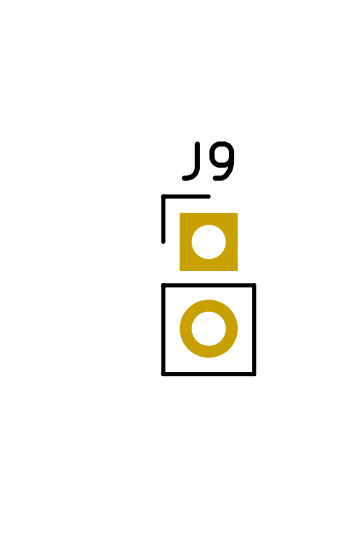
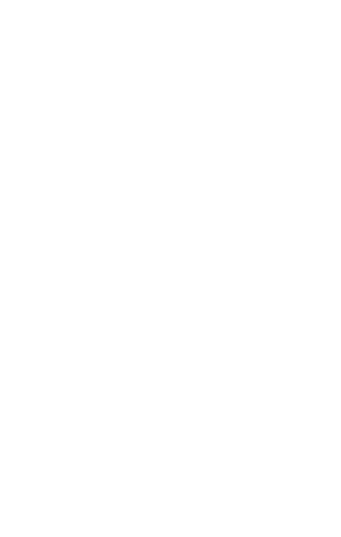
J9: (208, 285) -> none

